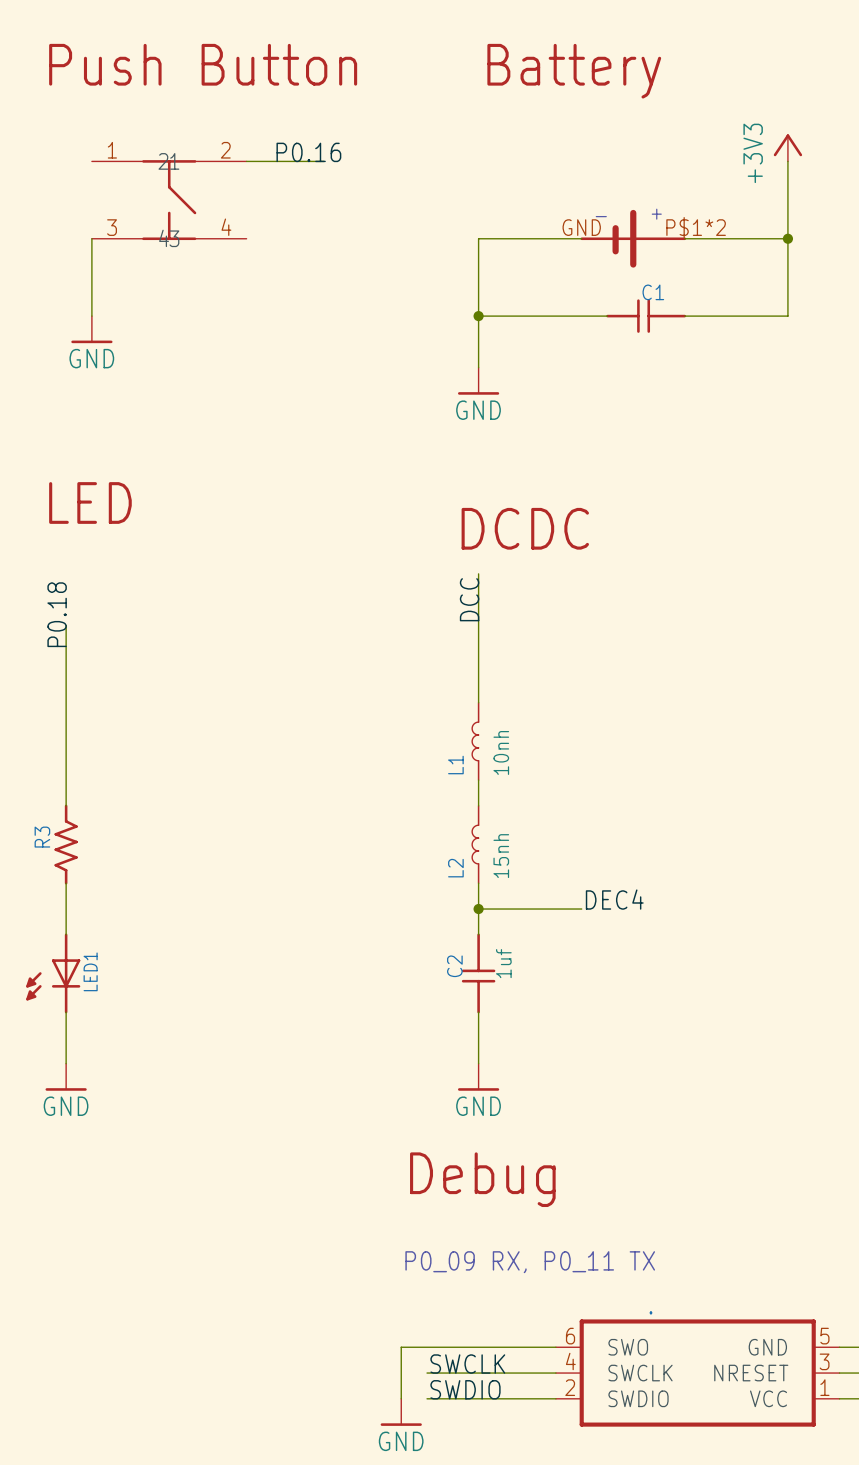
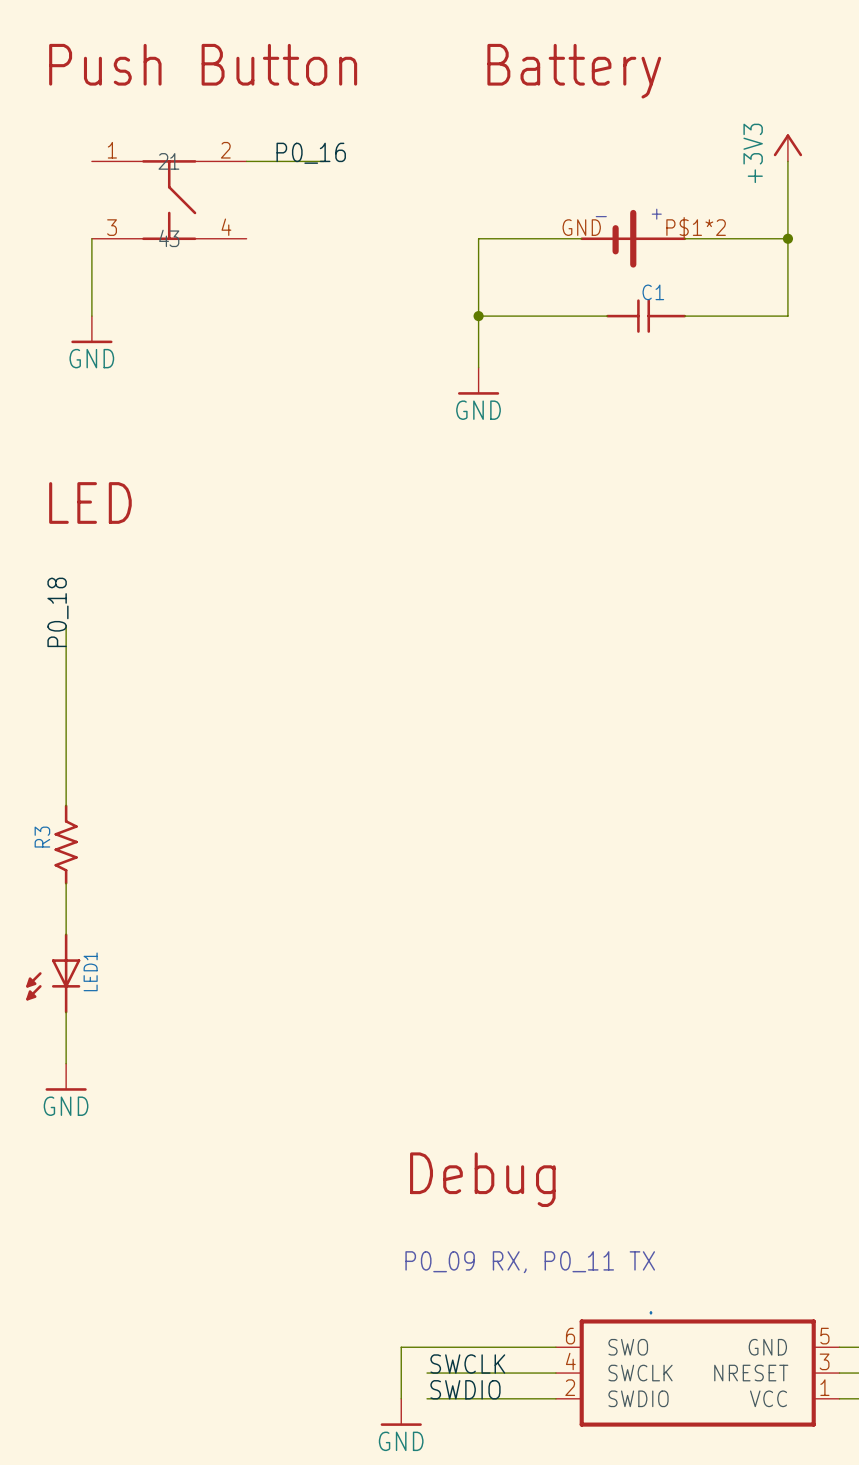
label: P0.16 (308, 152) -> P0_16 (311, 153)
text: DCDC (525, 528) -> none
wire: (478, 573) (478, 702) -> none
label: DCC (469, 599) -> none
label: P0.18 (57, 614) -> P0_18 (57, 612)
L1: 10nh (475, 741) -> none
wire: (478, 780) (478, 805) -> none
L2: 15nh (475, 844) -> none
wire: (478, 883) (478, 934) -> none
label: DEC4 (614, 899) -> none
wire: (478, 909) (581, 909) -> none
junction: (478, 909) -> none
C2: 1uf (478, 973) -> none
wire: (478, 1012) (478, 1063) -> none
power symbol: GND (478, 1077) -> none

